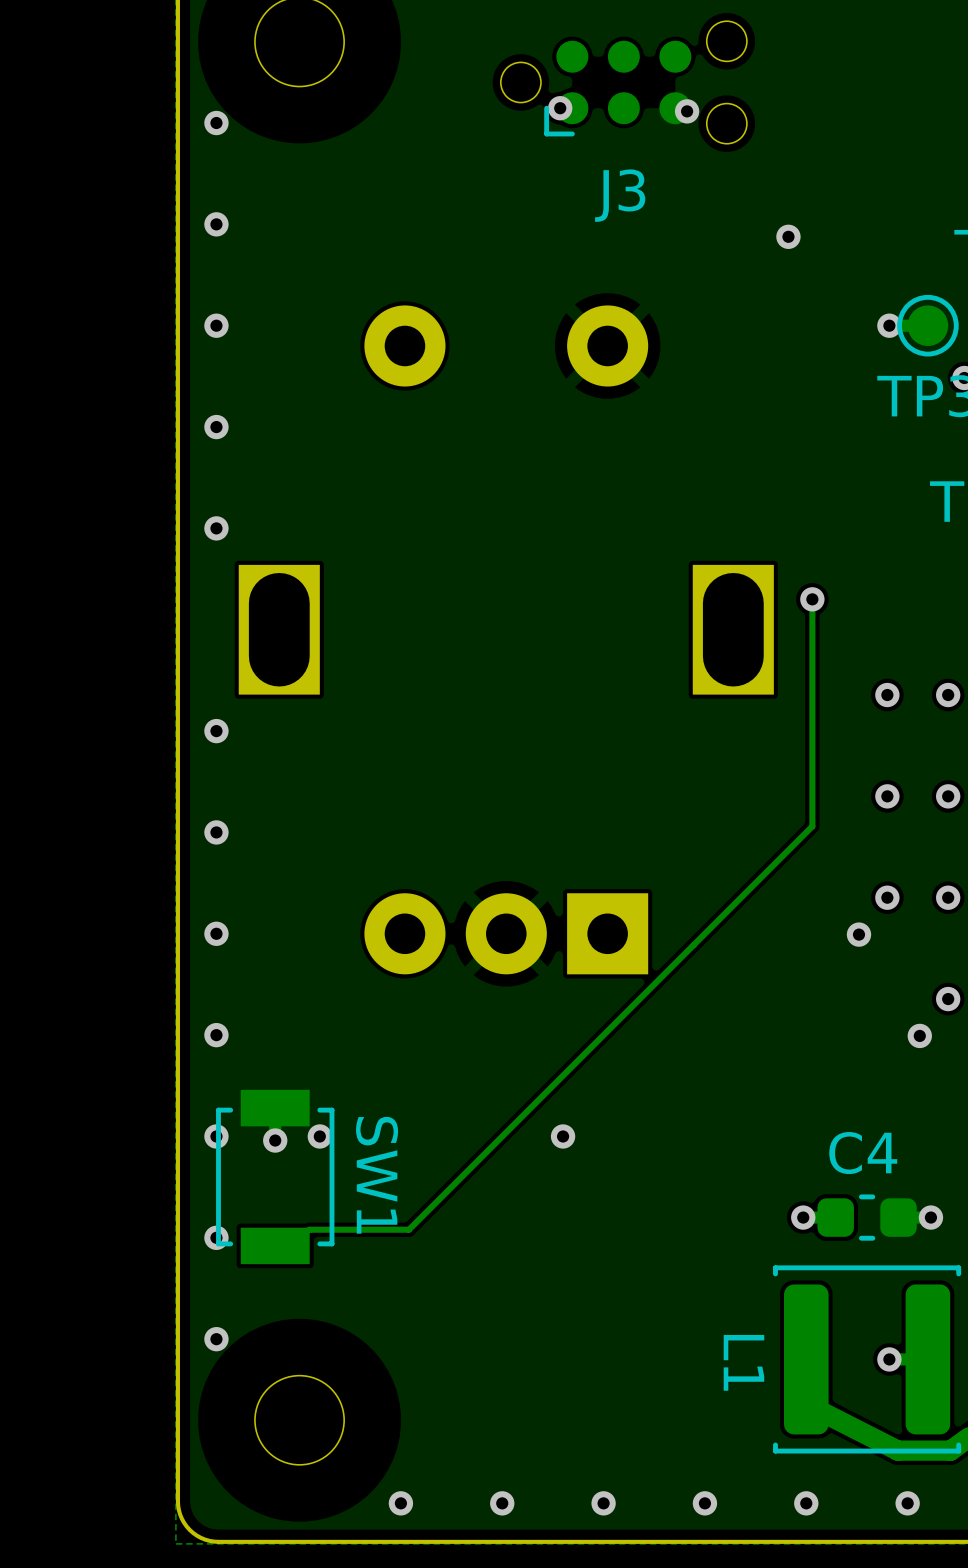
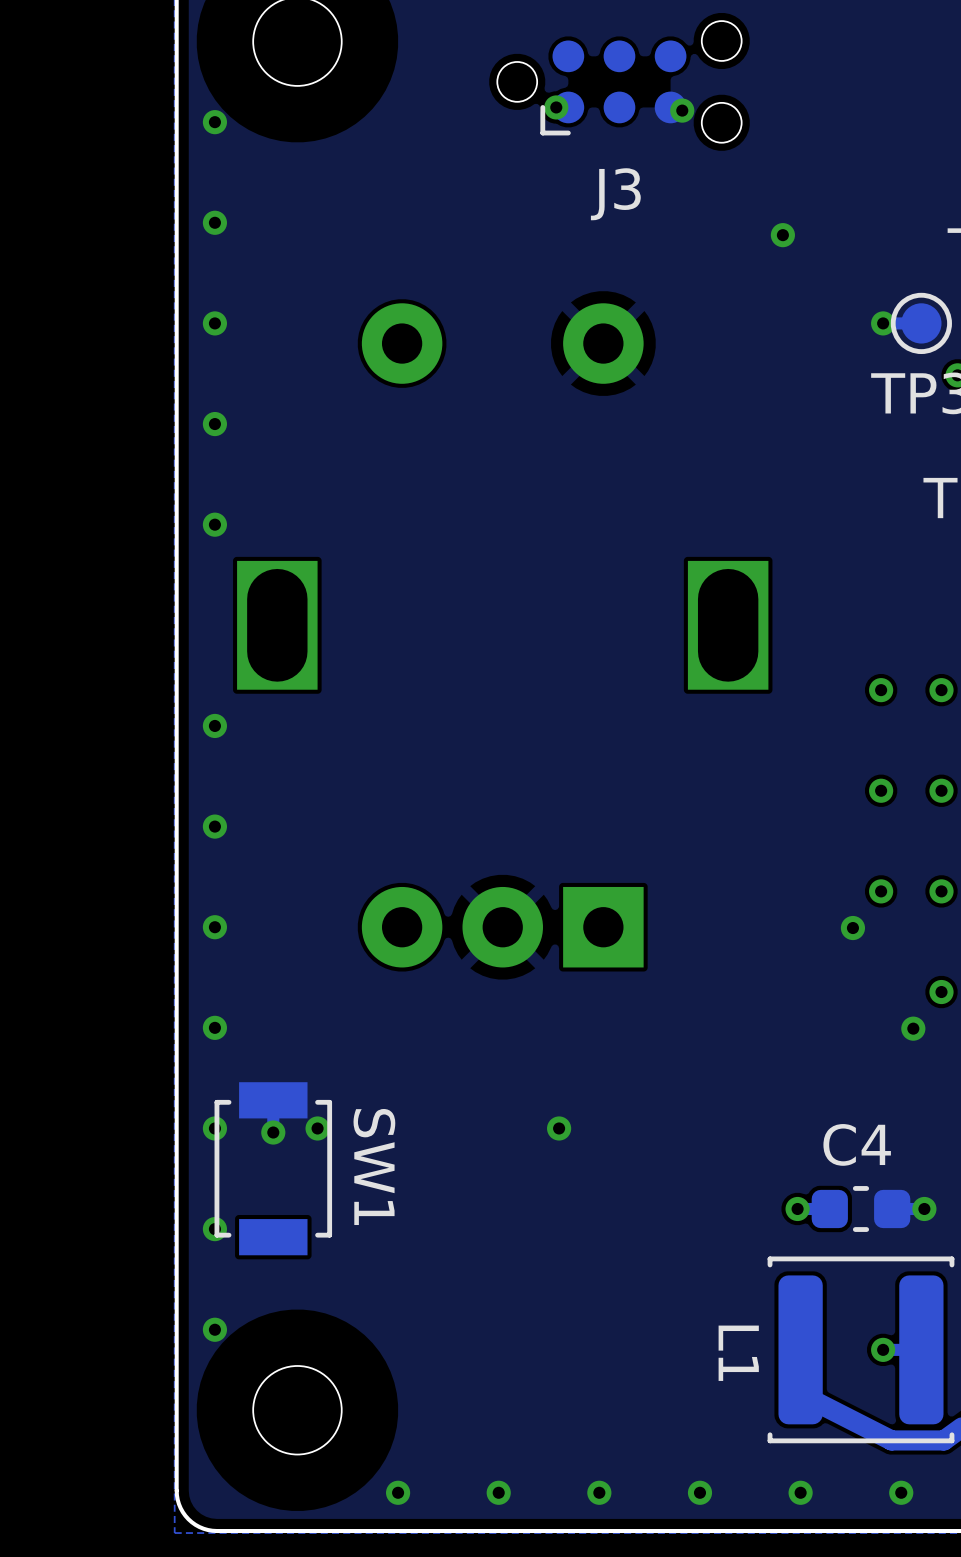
track: (812, 599) (812, 826) (409, 1229) (309, 1229) (275, 1245) -> none
via: (812, 599) -> none

